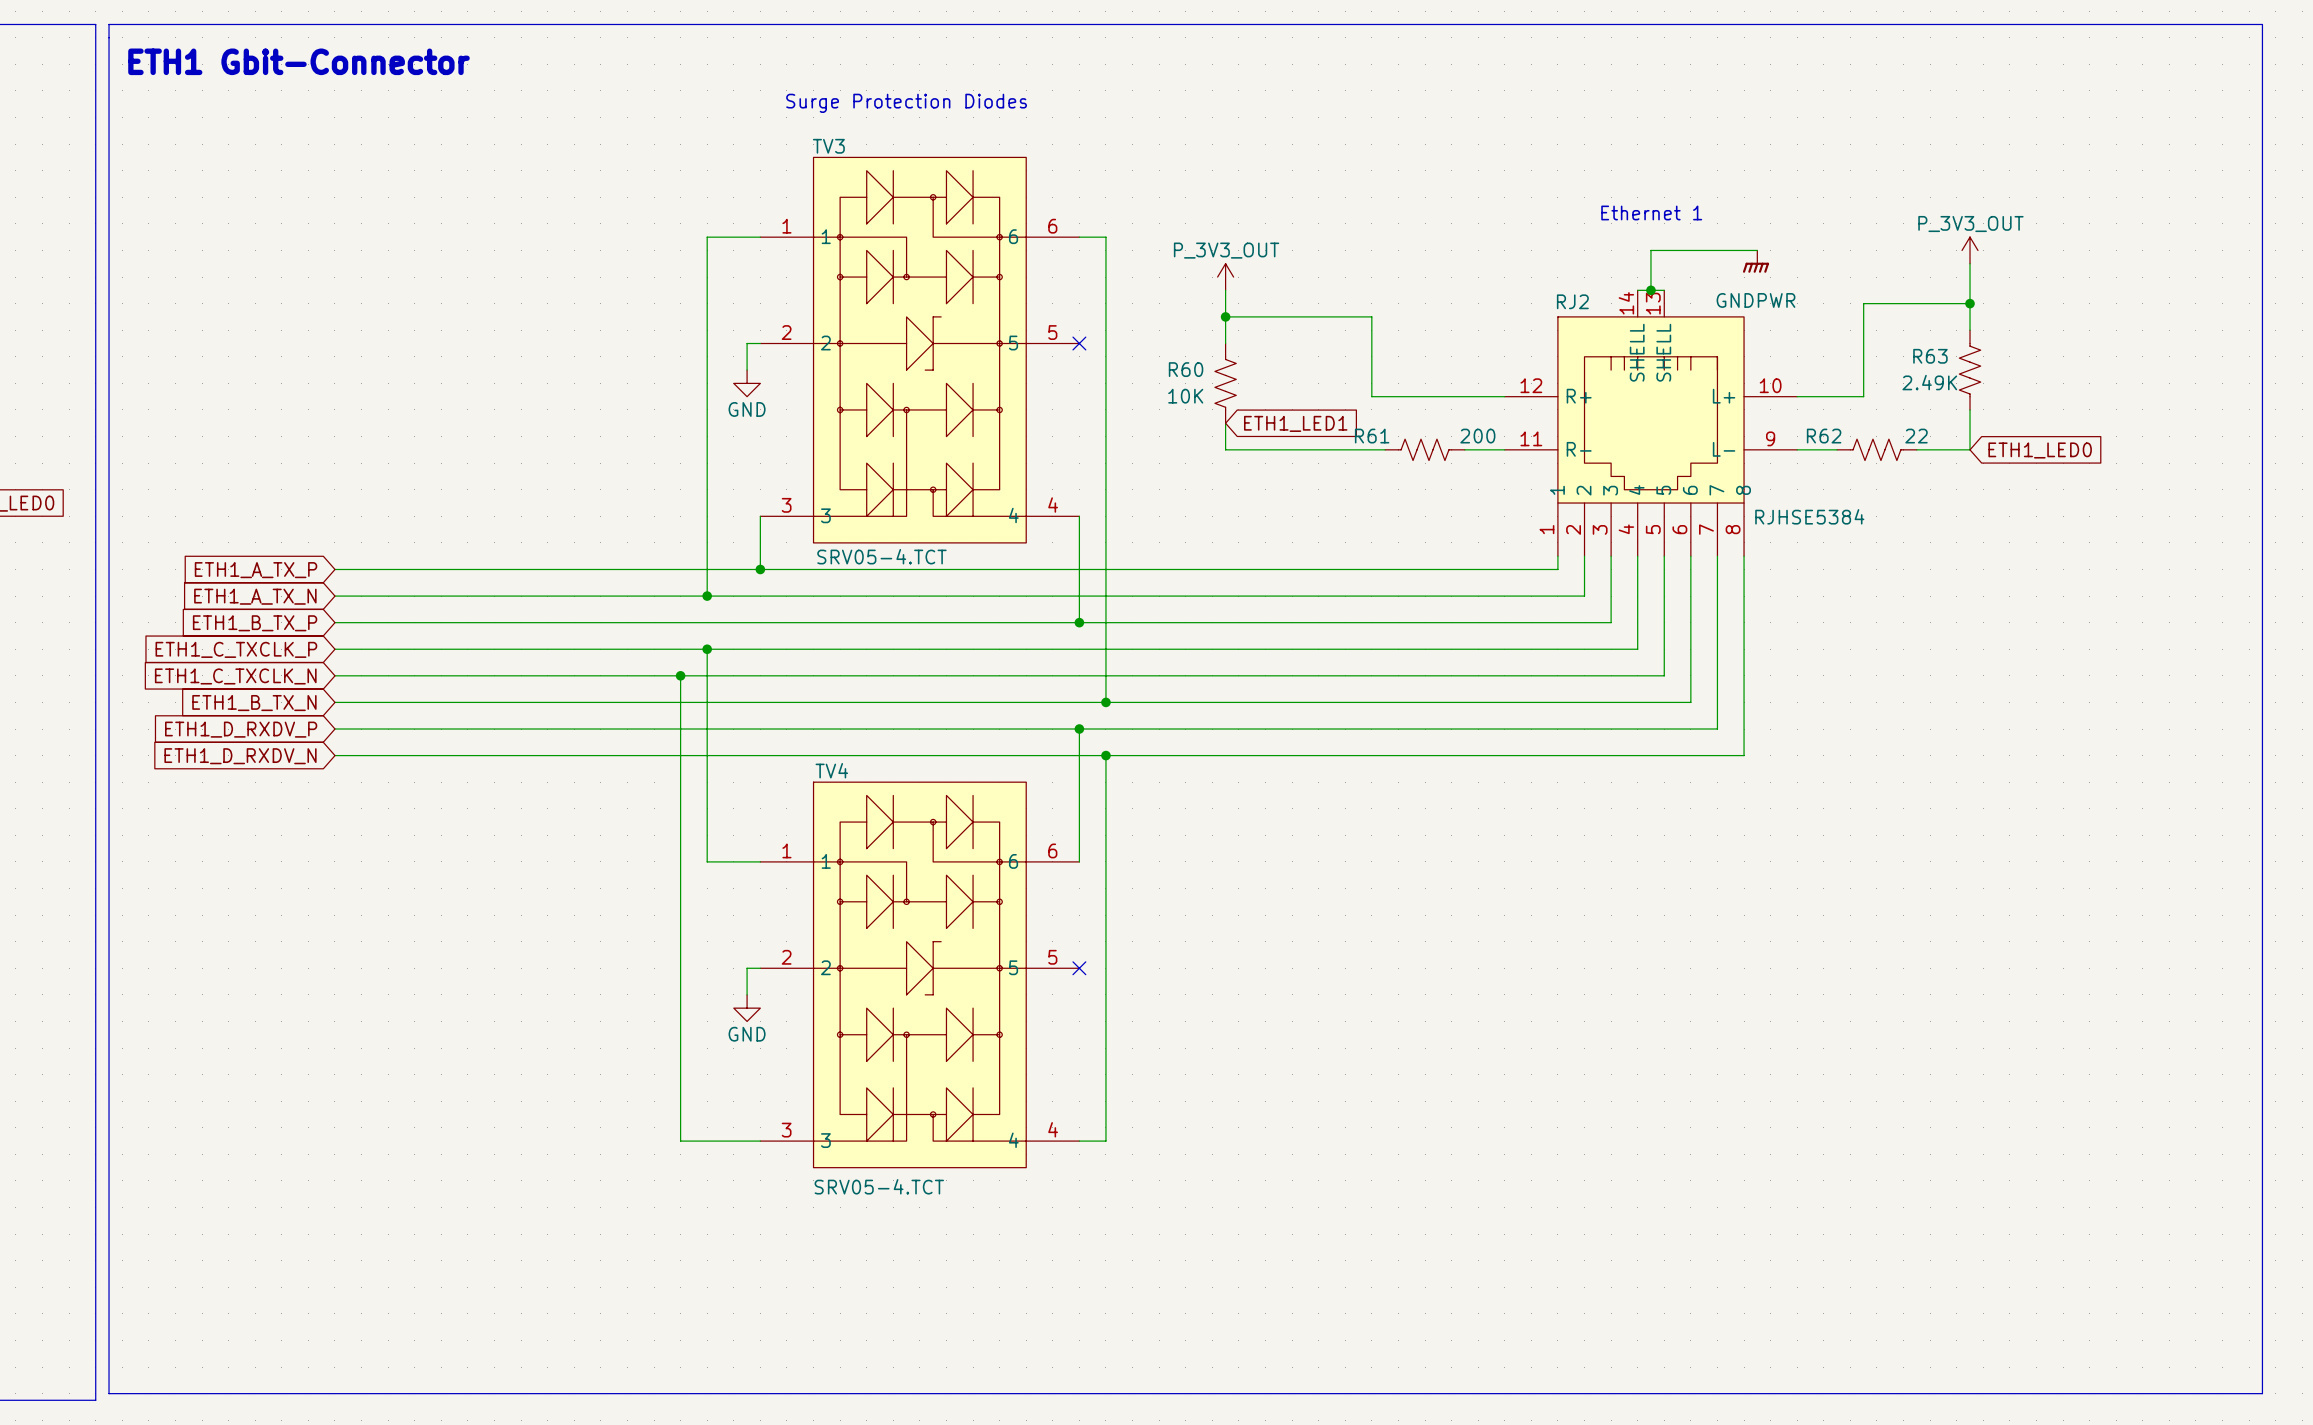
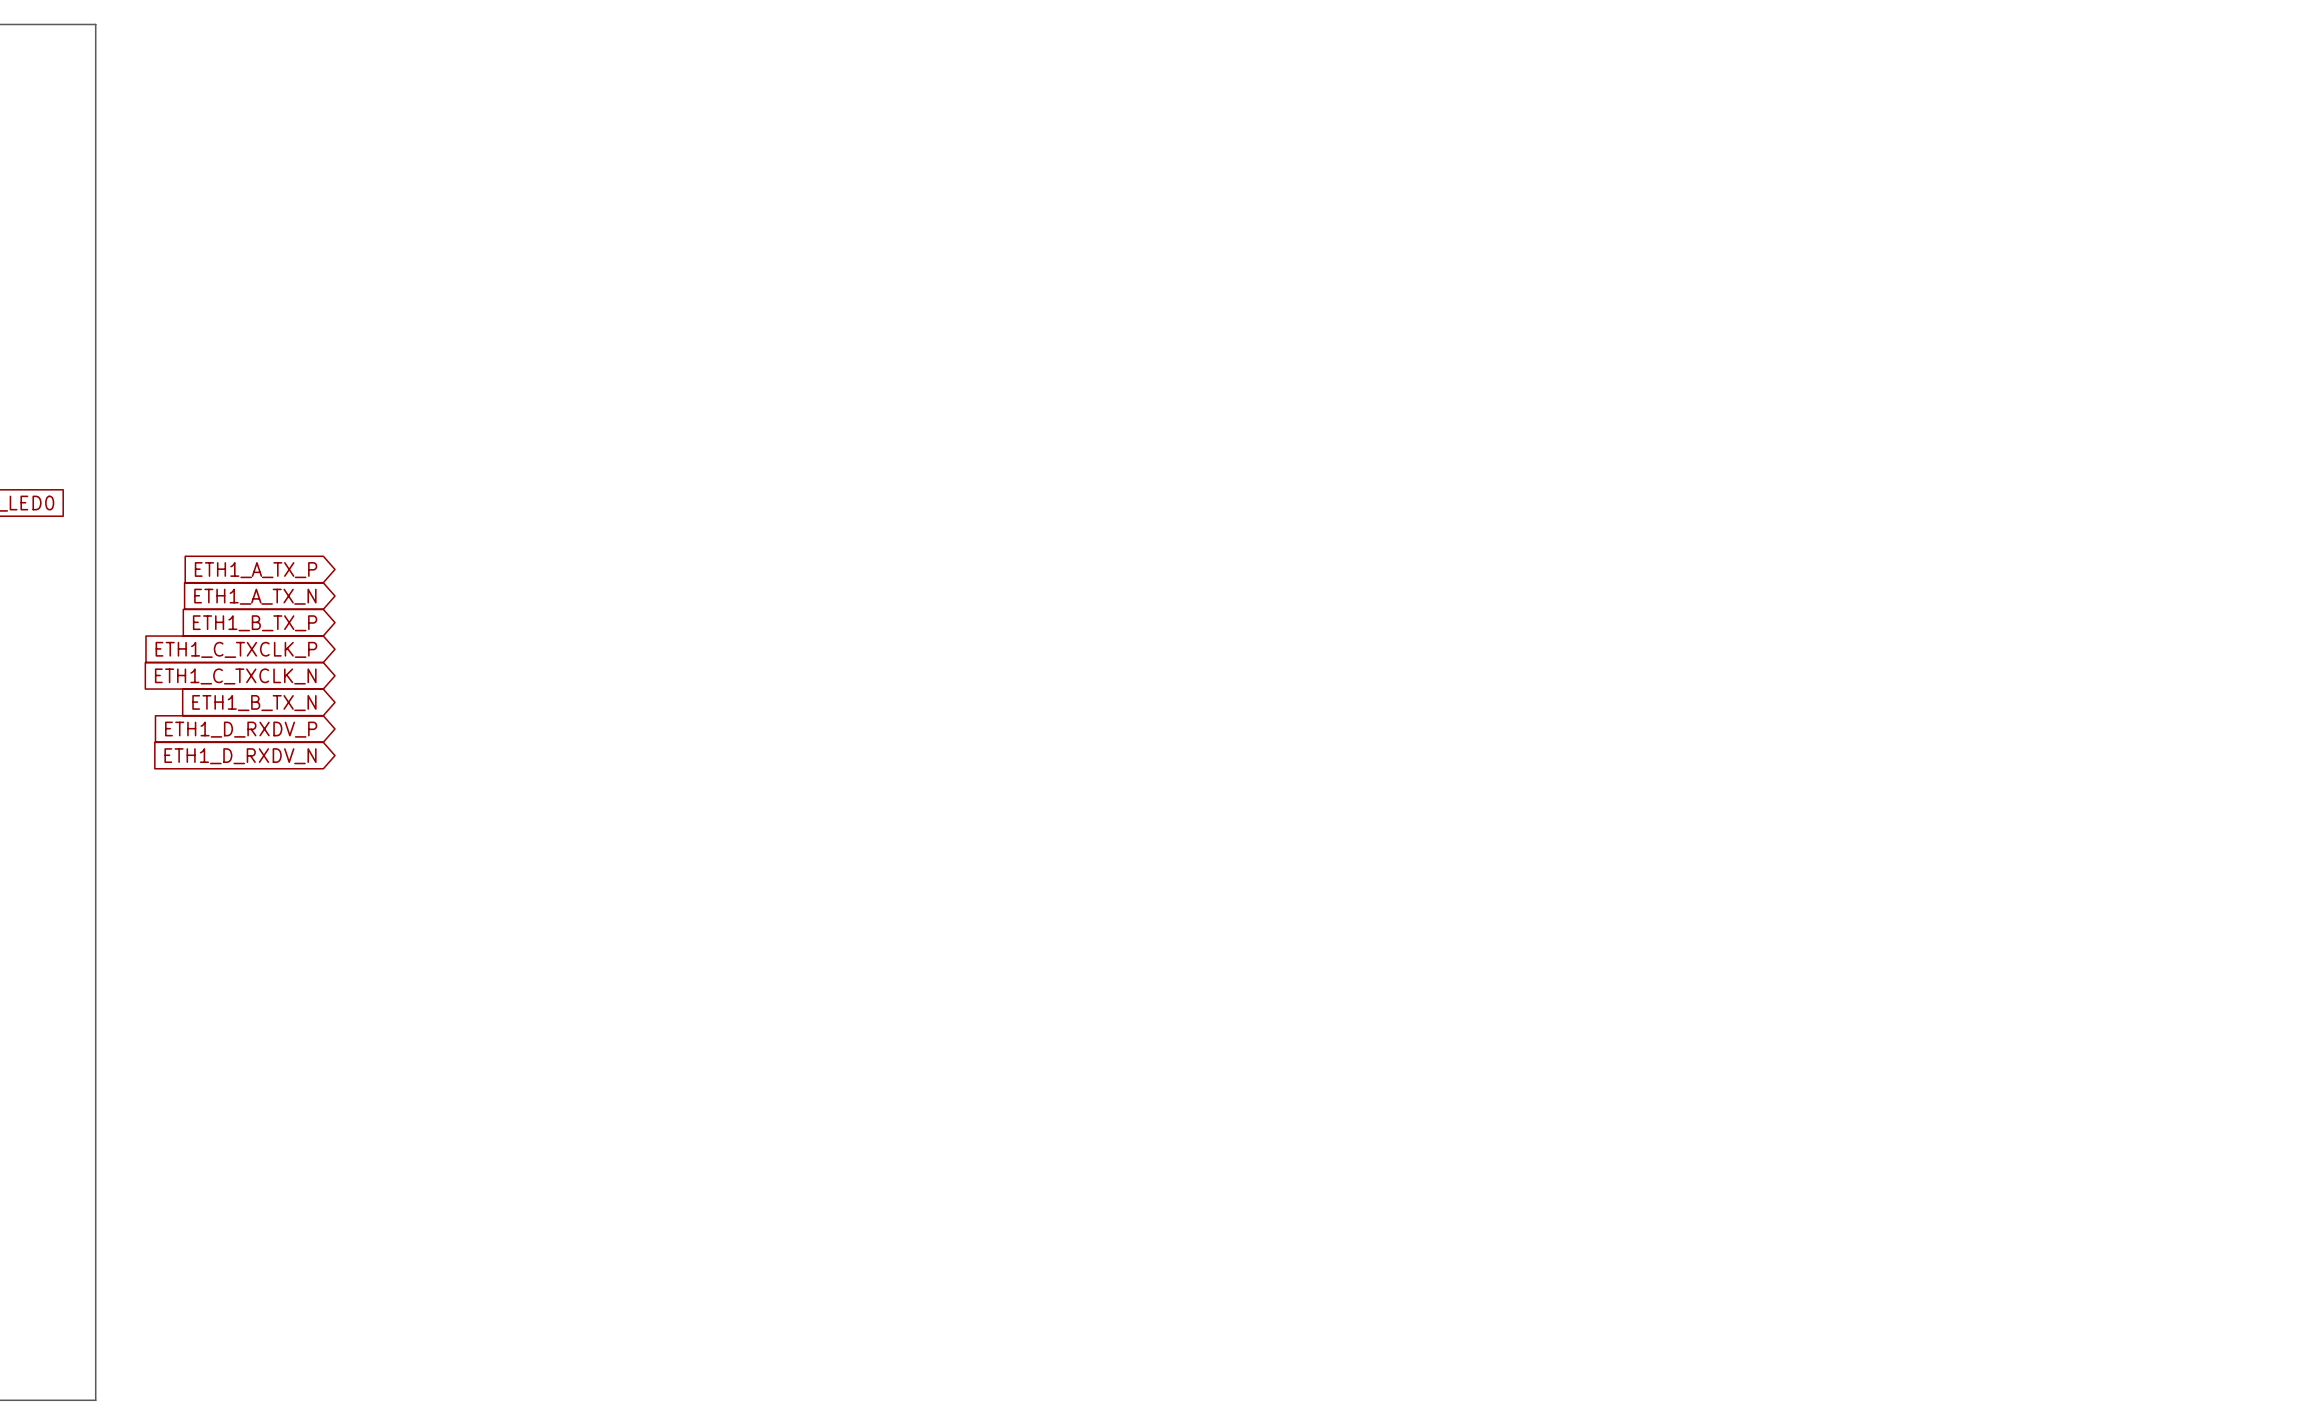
line: (109, 24) (2262, 24) (2262, 1393) (109, 1393) (109, 24) -> none
text: ETH1 Gbit-Connector (298, 61) -> none
text: Surge Protection Diodes (906, 103) -> none
text: Ethernet 1 (1651, 212) -> none
wire: (760, 237) (707, 237) (707, 596) -> none
wire: (1079, 237) (1105, 237) (1105, 702) -> none
wire: (1757, 250) (1650, 250) (1650, 290) -> none
power symbol: P_3V3_OUT (1970, 250) -> none
power symbol: GNDPWR (1755, 261) -> none
wire: (1970, 263) (1970, 330) -> none
power symbol: P_3V3_OUT (1225, 277) -> none
wire: (1225, 290) (1225, 343) -> none
wire: (1637, 290) (1664, 290) -> none
junction: (1650, 290) -> none
wire: (1970, 303) (1863, 303) (1863, 396) (1797, 396) -> none
junction: (1970, 303) -> none
wire: (1225, 316) (1371, 316) (1371, 396) (1504, 396) -> none
junction: (1225, 316) -> none
wire: (760, 343) (747, 343) (747, 370) -> none
no-connect mark: (1079, 343) -> none
TV3: SRV05-4.TCT (919, 350) -> none
R63: 2.49K (1970, 370) -> none
power symbol: GND (747, 383) -> none
R60: 10K (1225, 383) -> none
wire: (1970, 409) (1970, 449) (1916, 449) -> none
wire: (1225, 423) (1225, 449) (1385, 449) -> none
global label: ETH1_LED1 (1295, 423) -> none
RJ2: RJHSE5384 (1650, 423) -> none
R61: 200 (1425, 449) -> none
wire: (1464, 449) (1504, 449) -> none
wire: (1797, 449) (1837, 449) -> none
R62: 22 (1876, 449) -> none
global label: ETH1_LED0 (2040, 450) -> none
wire: (760, 516) (760, 569) -> none
wire: (1079, 516) (1079, 622) -> none
wire: (1557, 556) (1557, 569) (334, 569) -> none
wire: (1584, 556) (1584, 596) (334, 596) -> none
wire: (1611, 556) (1611, 622) (334, 622) -> none
wire: (1637, 556) (1637, 649) (334, 649) -> none
wire: (1664, 556) (1664, 675) (334, 675) -> none
wire: (1690, 556) (1690, 702) (334, 702) -> none
wire: (1717, 556) (1717, 729) (334, 729) -> none
wire: (1744, 556) (1744, 755) (334, 755) -> none
junction: (760, 569) -> none
junction: (707, 596) -> none
junction: (1079, 622) -> none
wire: (707, 649) (707, 861) (760, 861) -> none
junction: (707, 649) -> none
wire: (680, 675) (680, 1141) (760, 1141) -> none
junction: (680, 675) -> none
junction: (1105, 702) -> none
wire: (1079, 729) (1079, 861) -> none
junction: (1079, 729) -> none
wire: (1105, 755) (1105, 1141) (1079, 1141) -> none
junction: (1105, 755) -> none
wire: (760, 968) (747, 968) (747, 994) -> none
no-connect mark: (1079, 968) -> none
TV4: SRV05-4.TCT (919, 974) -> none
power symbol: GND (747, 1008) -> none

